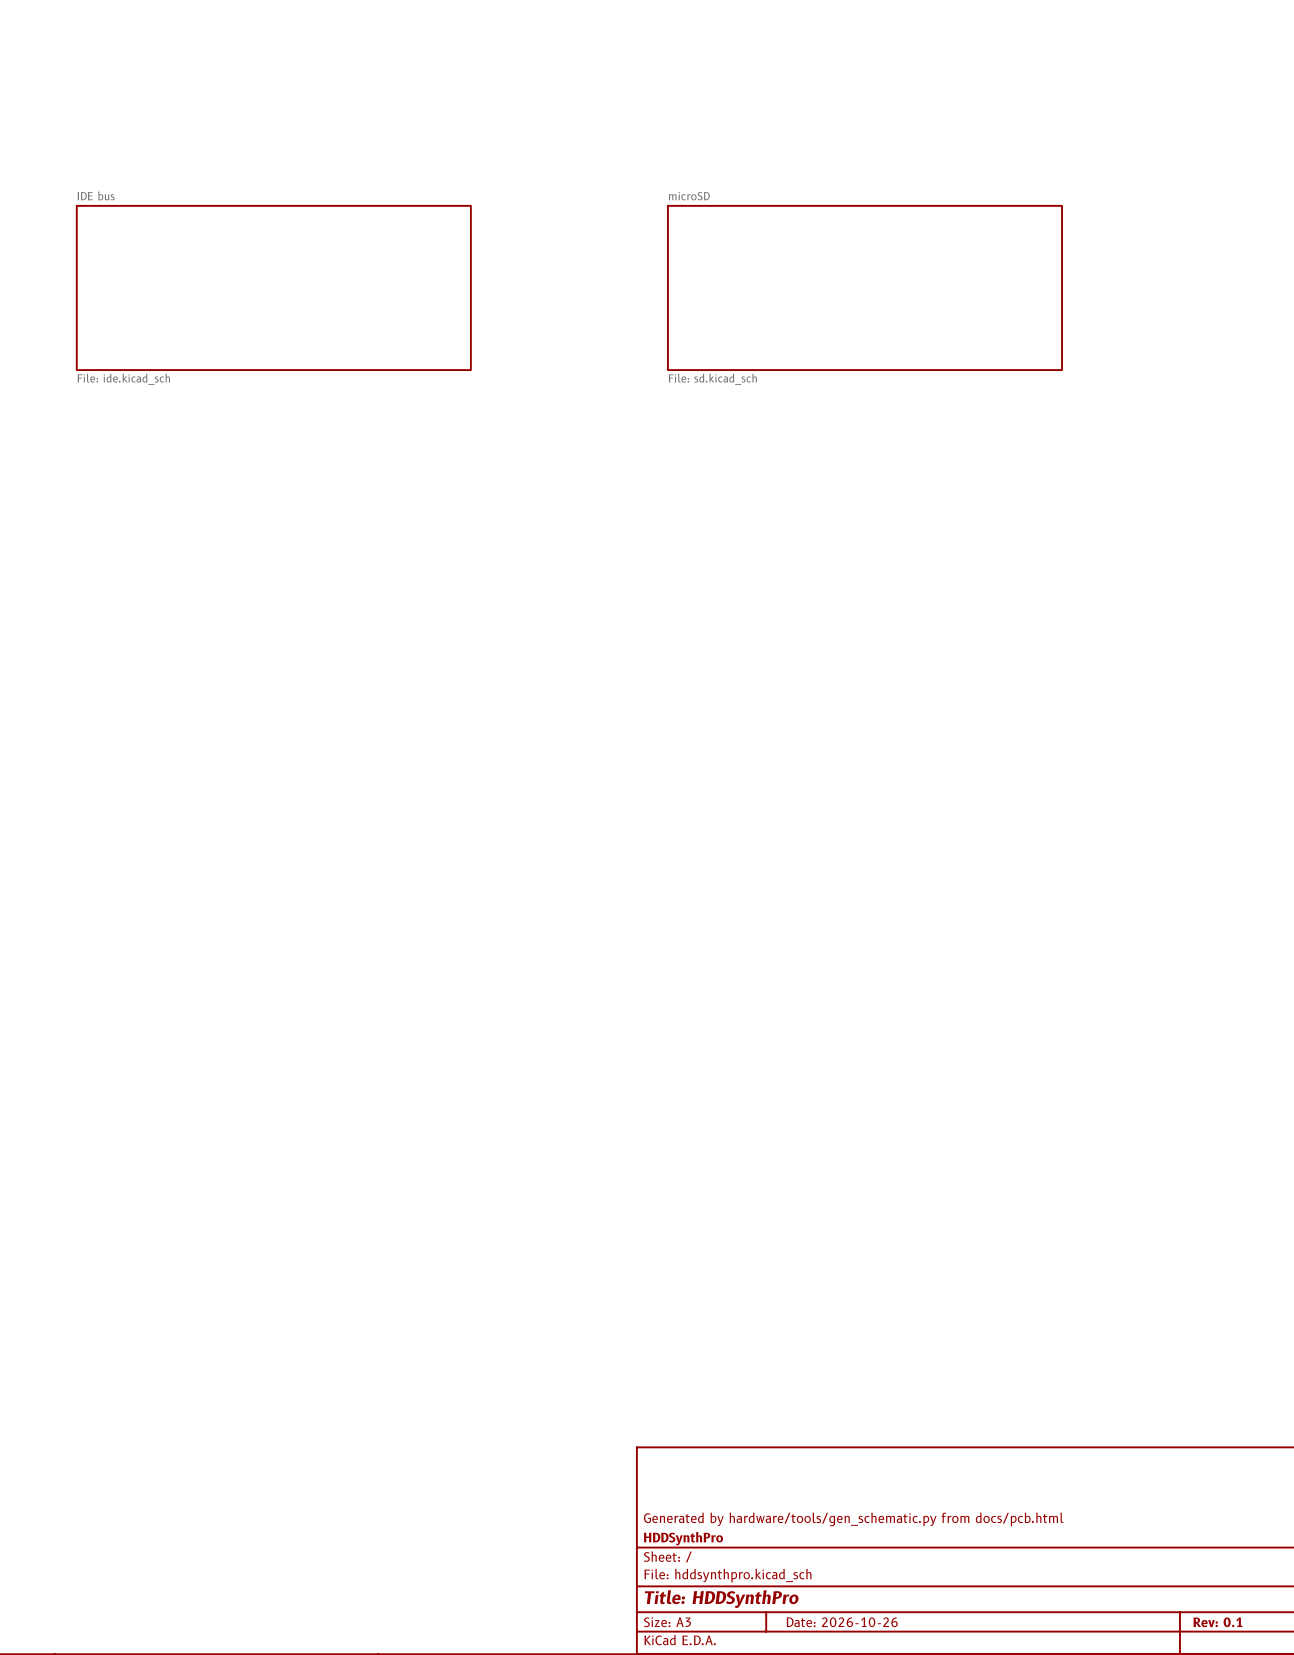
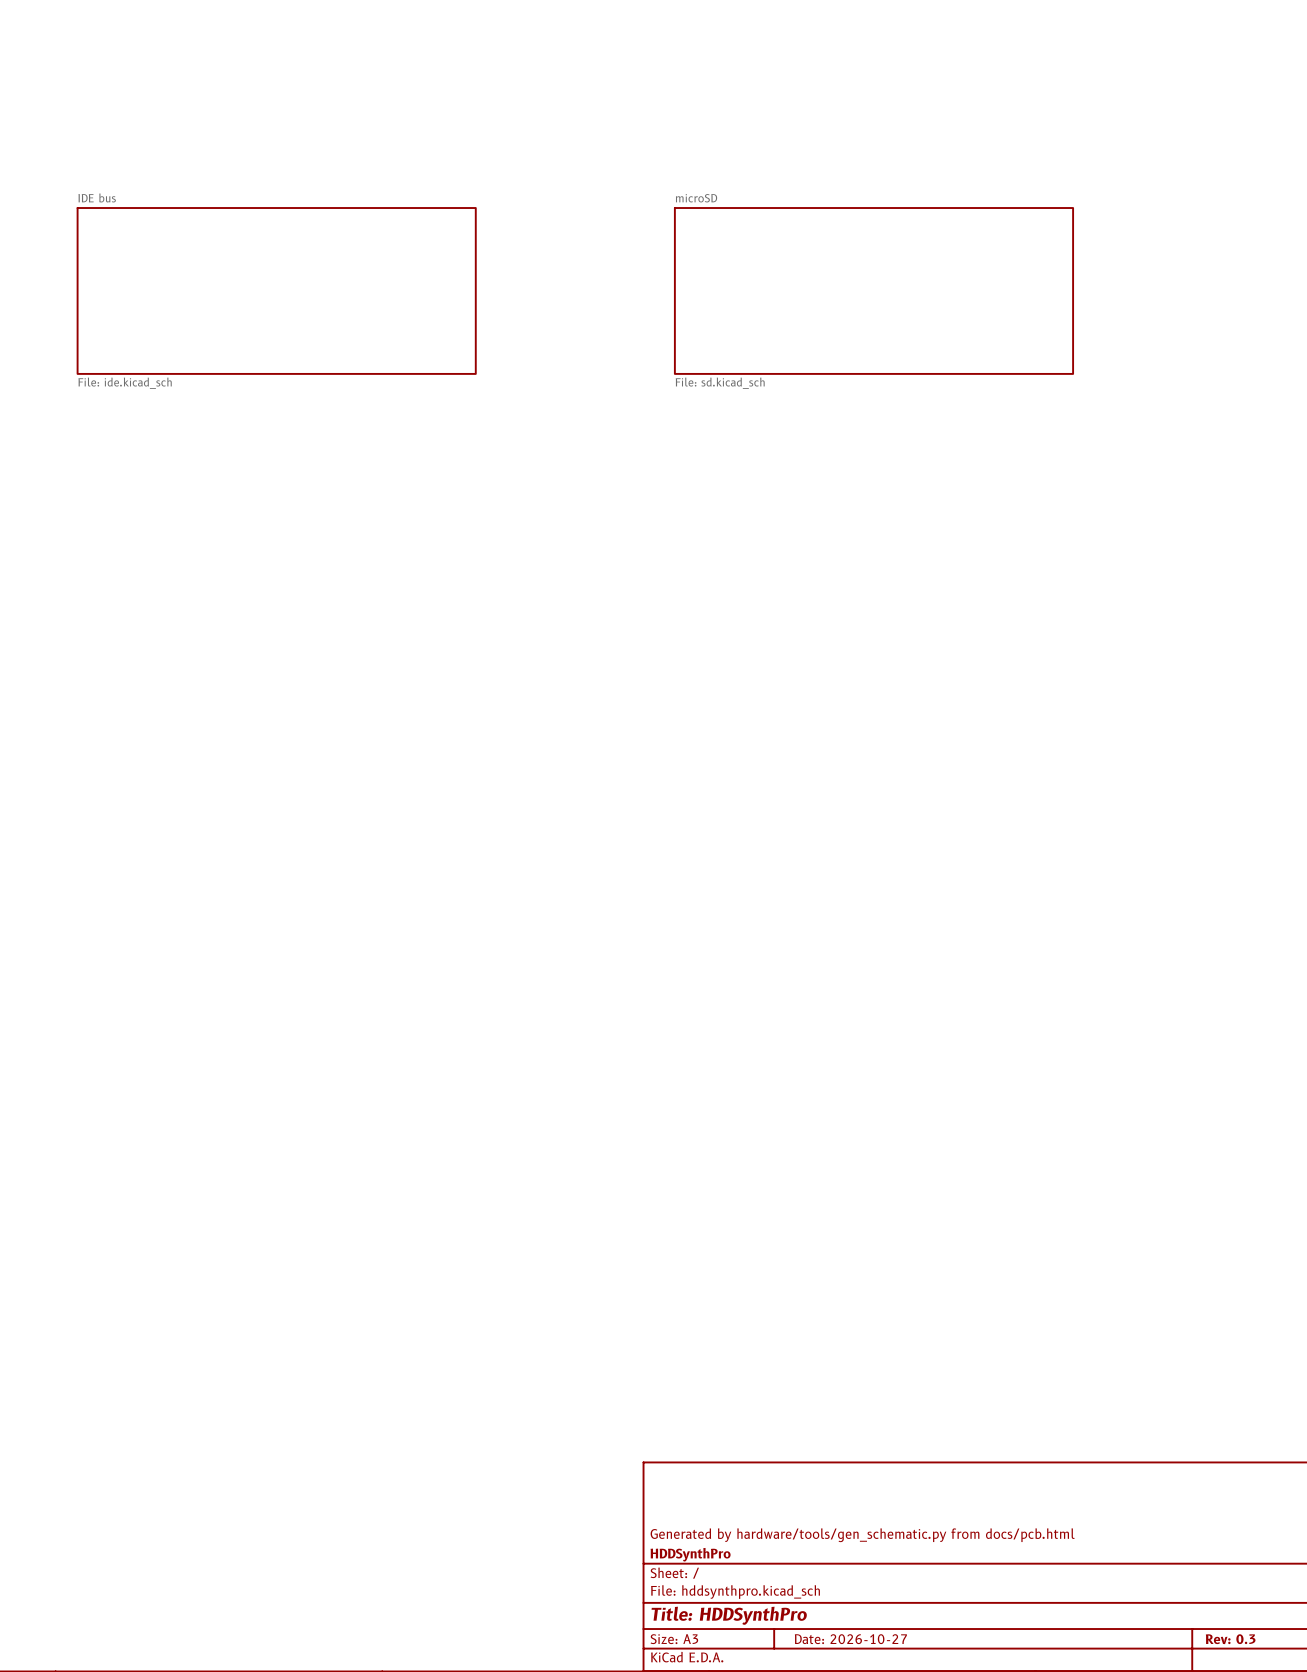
title block: Date: 2026-10-26 (842, 1622) -> Date: 2026-10-27 (850, 1639)
title block: Rev: 0.1 (1217, 1622) -> Rev: 0.3 (1230, 1639)

